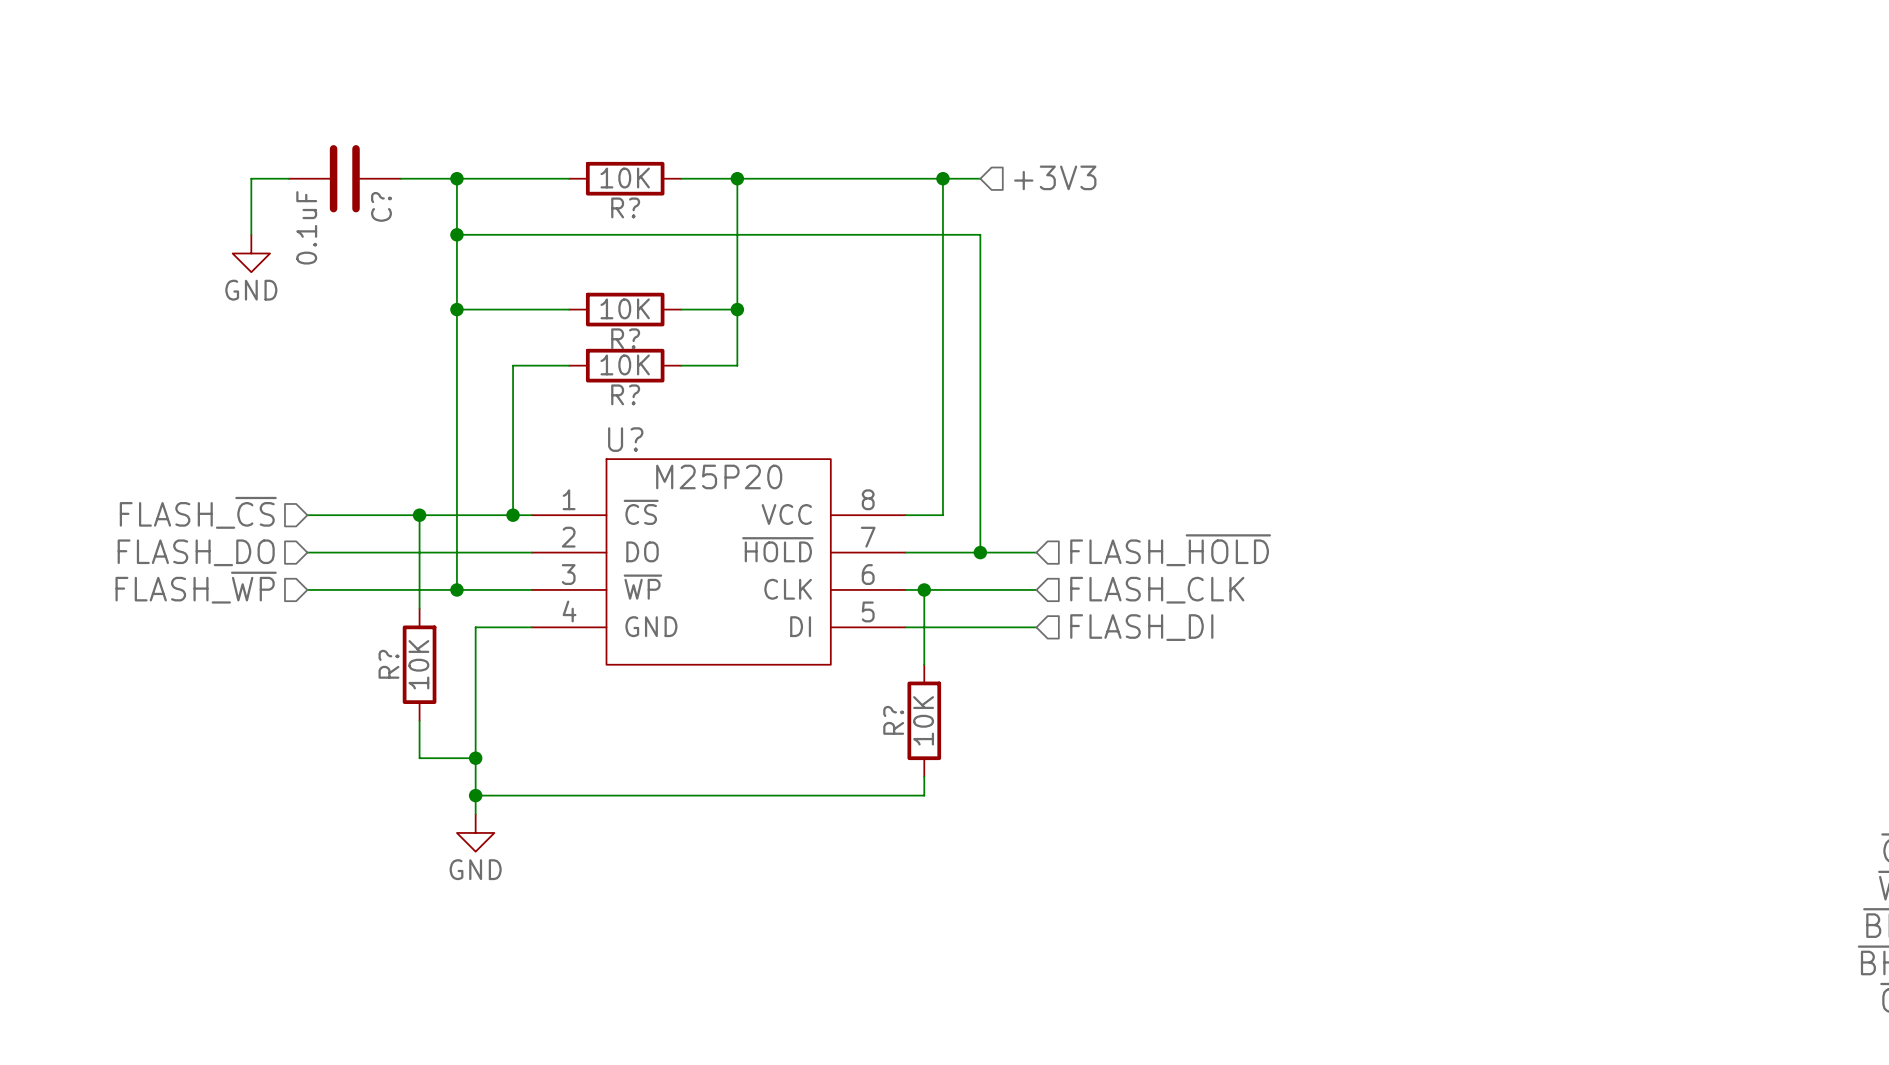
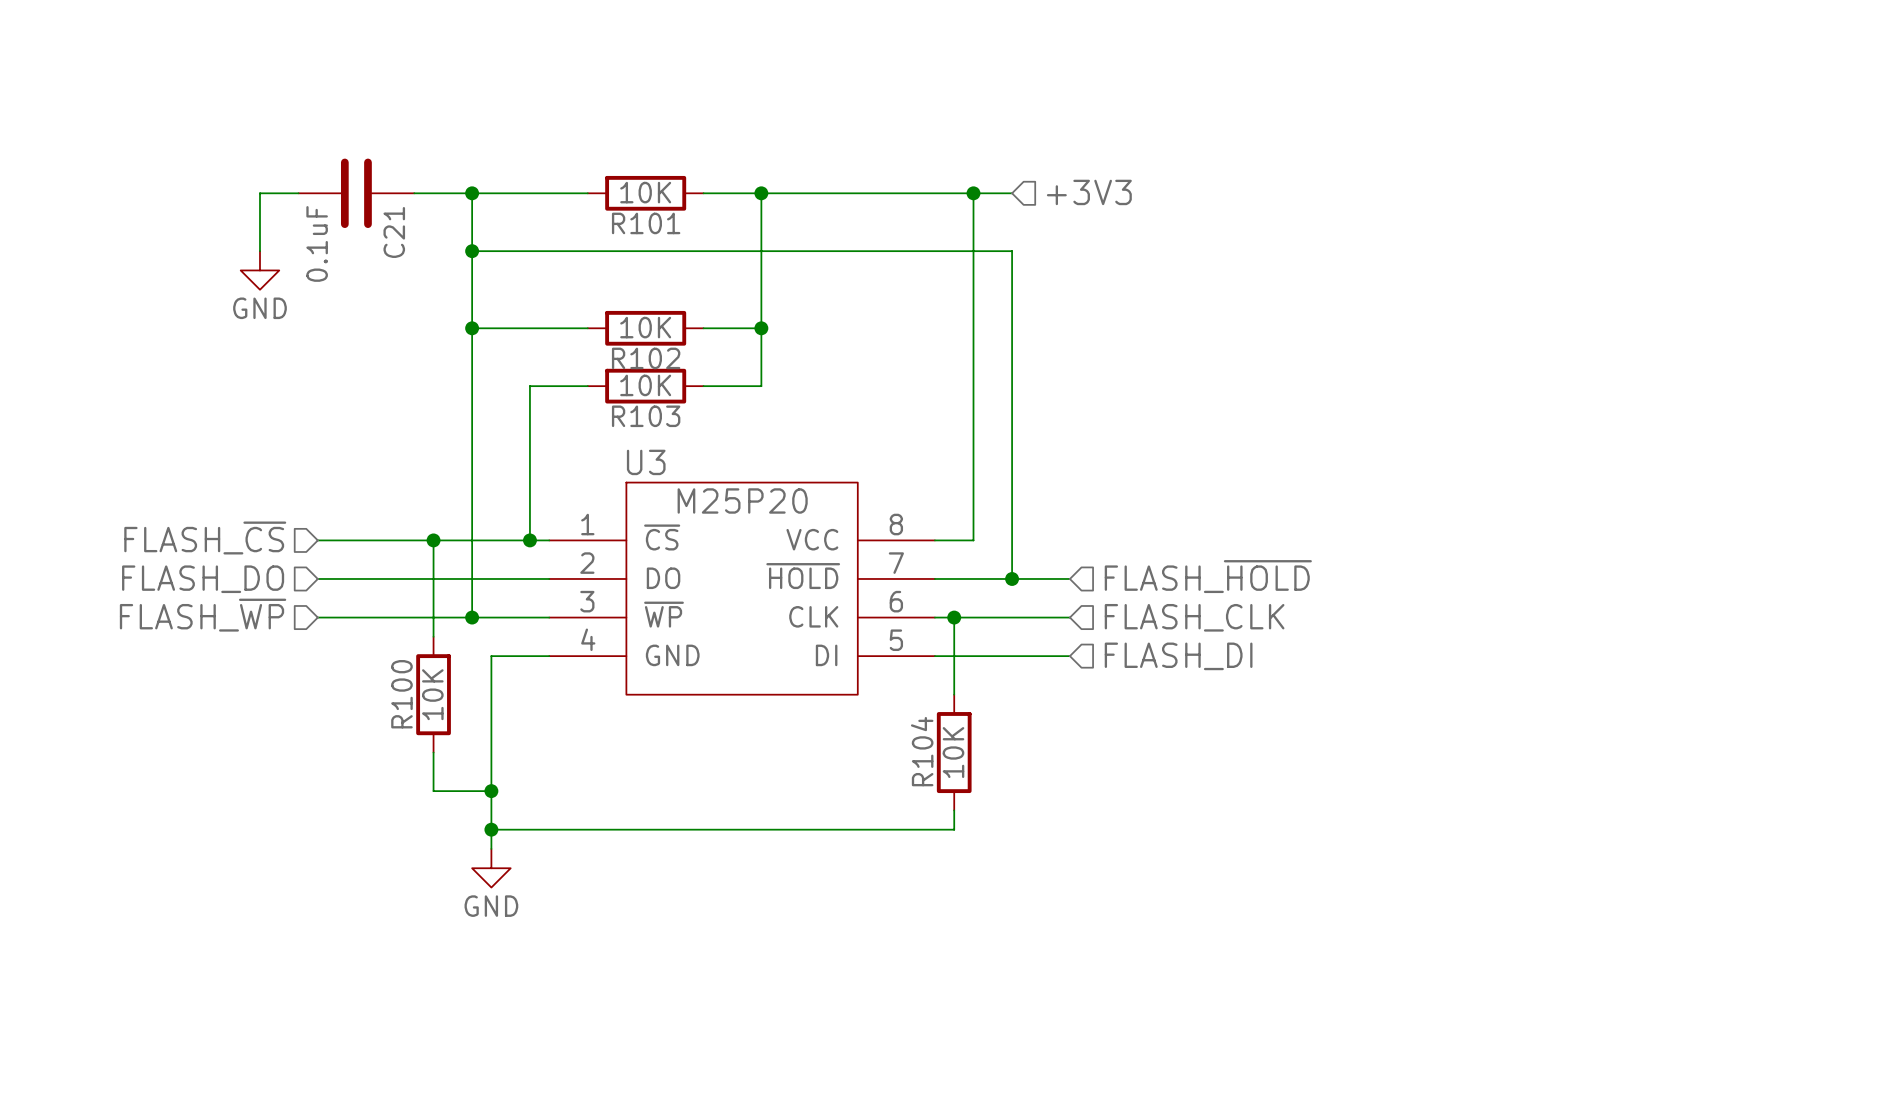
C? name: C? (381, 206) -> C21 (394, 232)
R? name: R? (625, 207) -> R101 (646, 223)
R? name: R? (625, 338) -> R102 (646, 358)
R? name: R? (625, 394) -> R103 (646, 416)
U? name: U? (625, 439) -> U3 (646, 462)
R? name: R? (388, 664) -> R100 (401, 694)
R? name: R? (893, 720) -> R104 (922, 751)

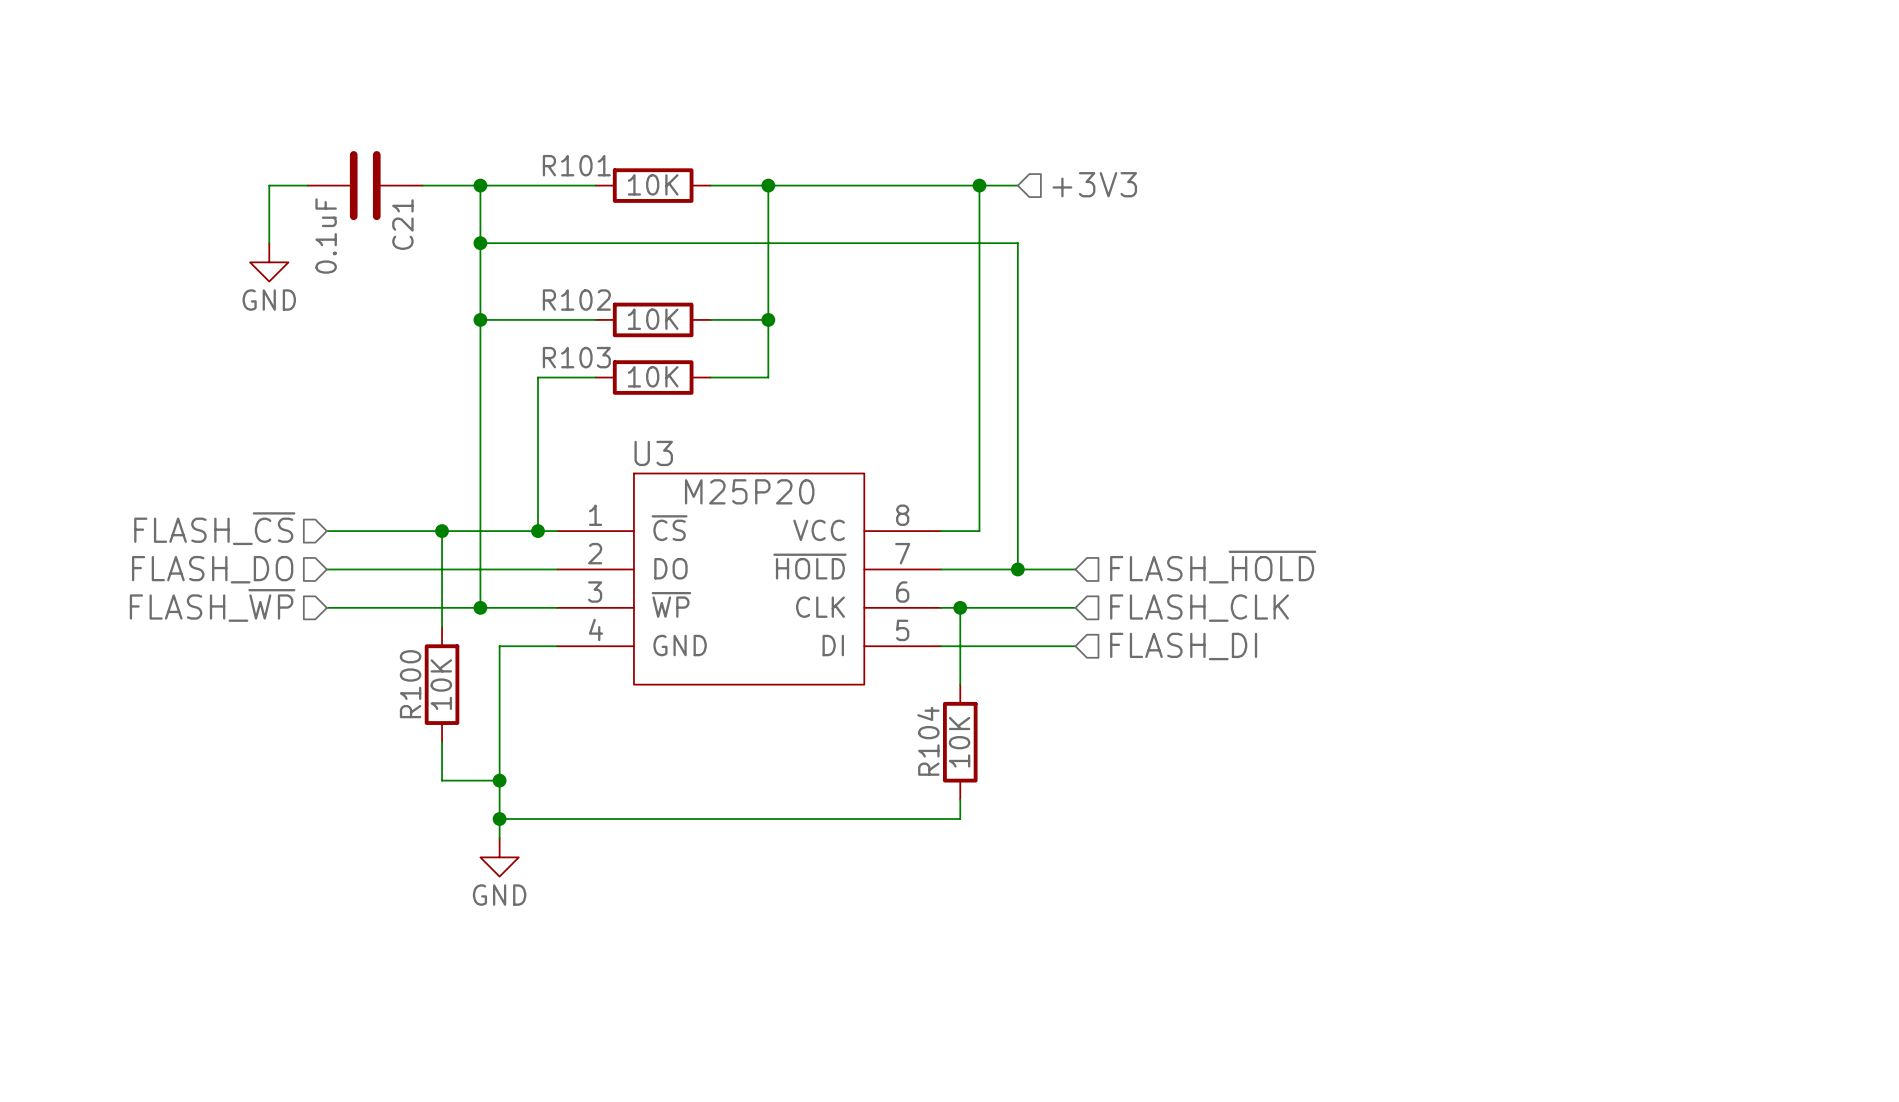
R101 name position: R101 (646, 223) -> R101 (576, 165)
R102 name position: R102 (646, 358) -> R102 (576, 300)
R103 name position: R103 (646, 416) -> R103 (576, 357)

